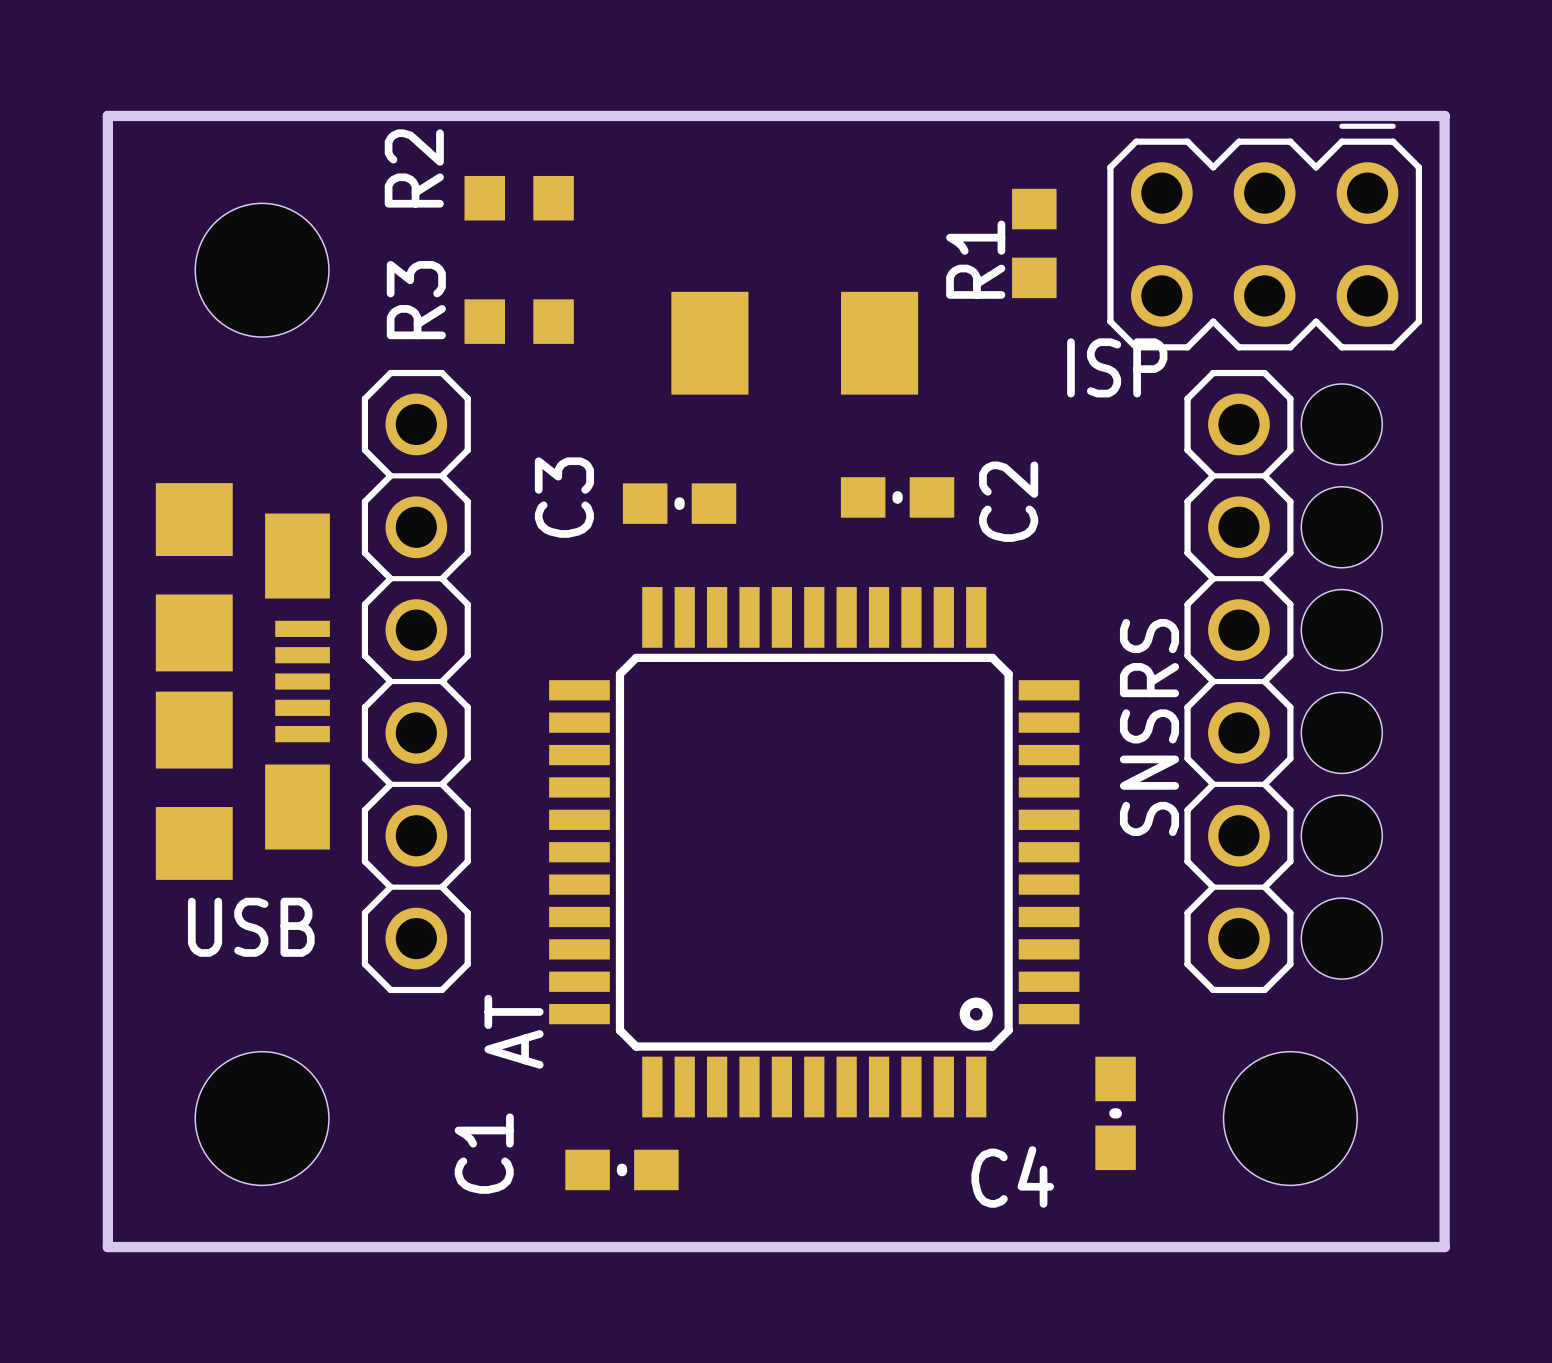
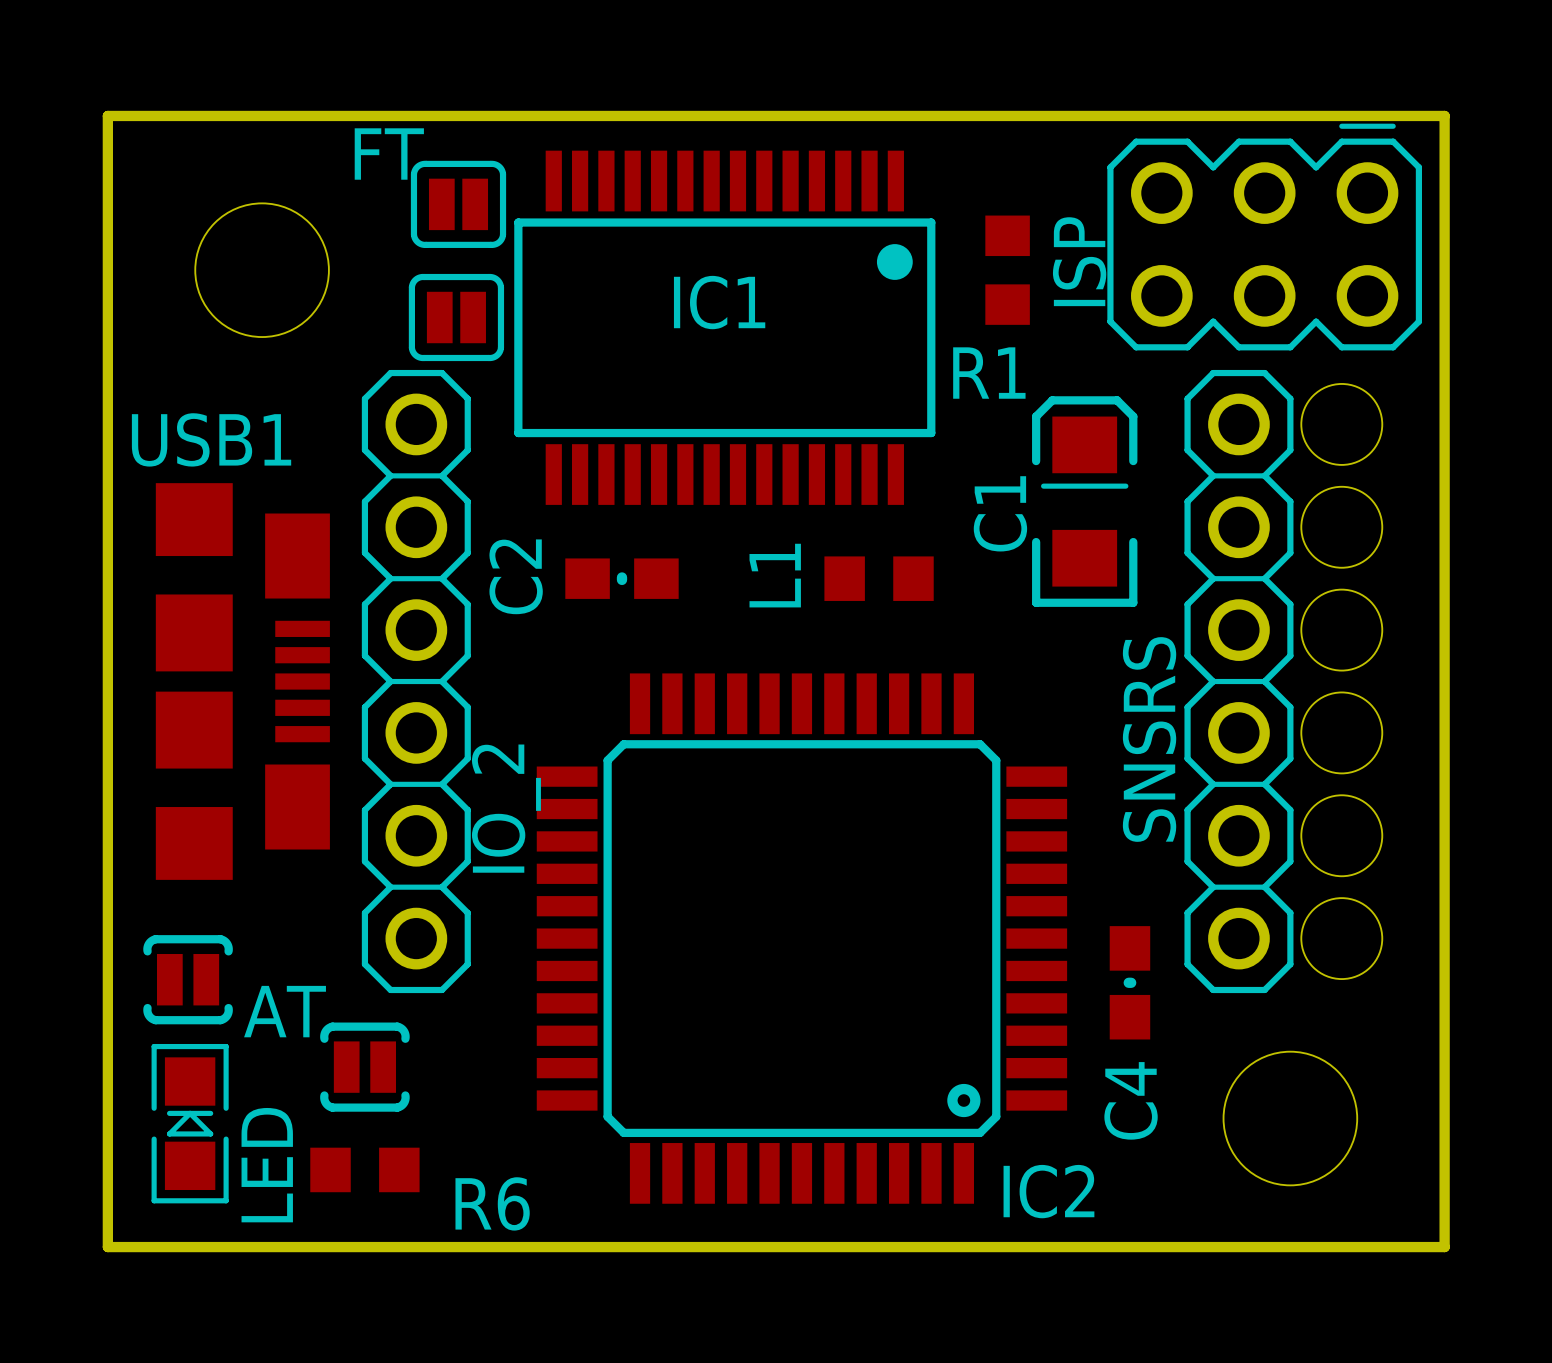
text: none -> FT (389, 154)
R2: (519, 198) -> none
part: none -> (458, 204)
R1 position: (1034, 243) -> (1007, 270)
R1 name rotation: 0° (975, 259) -> 90° clockwise (989, 373)
part: none -> (456, 317)
R3: (519, 321) -> none
IC1: none -> (724, 327)
part: (794, 343) -> none
ISP name rotation: 0° (1117, 367) -> 90° counterclockwise (1079, 261)
C2 position: (897, 497) -> (621, 578)
C2 name position: C2 (1008, 501) -> C2 (516, 576)
C3: (679, 503) -> none
L1: none -> (879, 578)
IO_2 name: none -> IO_2 (506, 808)
part: (814, 852) -> none
USB name: USB (251, 927) -> USB1 (211, 439)
IC2: none -> (801, 938)
part: none -> (188, 979)
text rotation: 0° (514, 1031) -> 90° clockwise (285, 1011)
text position: AT (514, 1031) -> AT (285, 1011)
part: none -> (364, 1067)
C4 position: (1115, 1113) -> (1129, 982)
part: (262, 1118) -> none
part: none -> (190, 1123)
C1 footprint: [565, 1149, 679, 1191] -> [1032, 396, 1138, 607]
text: none -> LED (267, 1165)
R6: none -> (364, 1169)
C4 name rotation: 0° (1012, 1176) -> 90° counterclockwise (1131, 1100)

